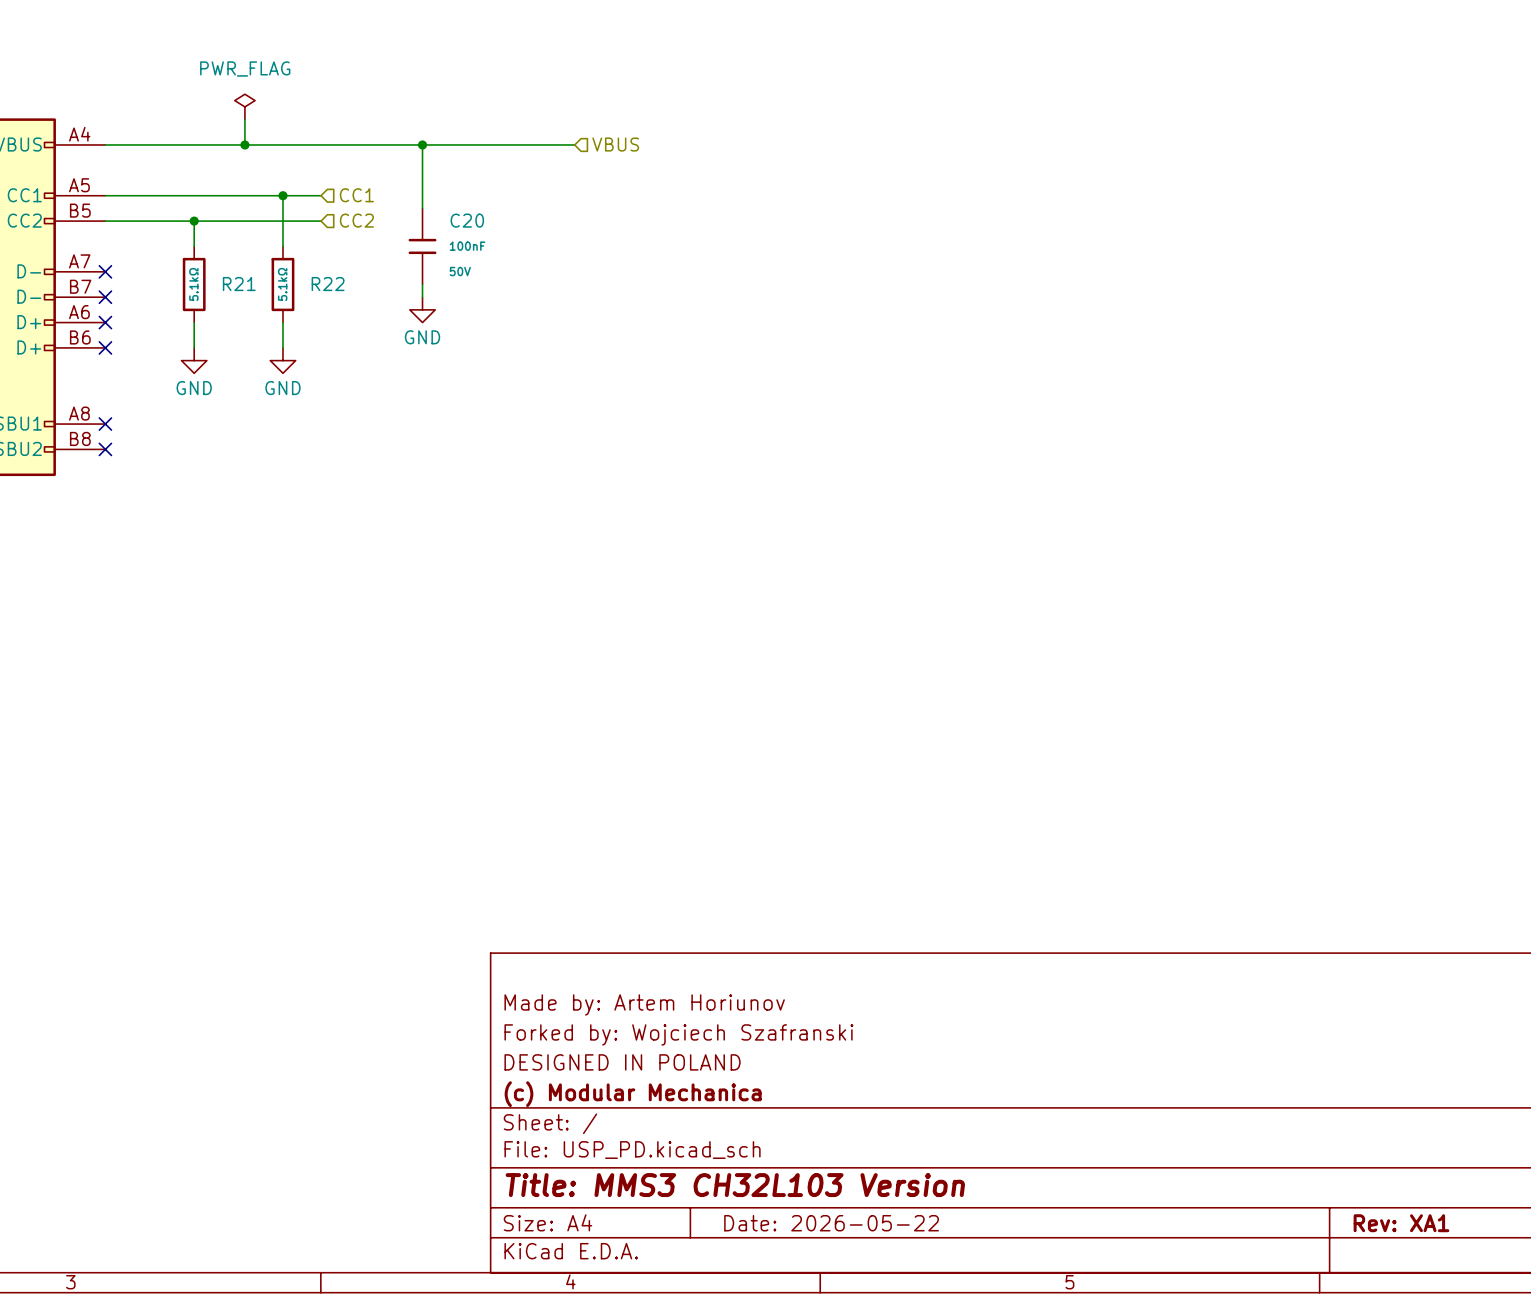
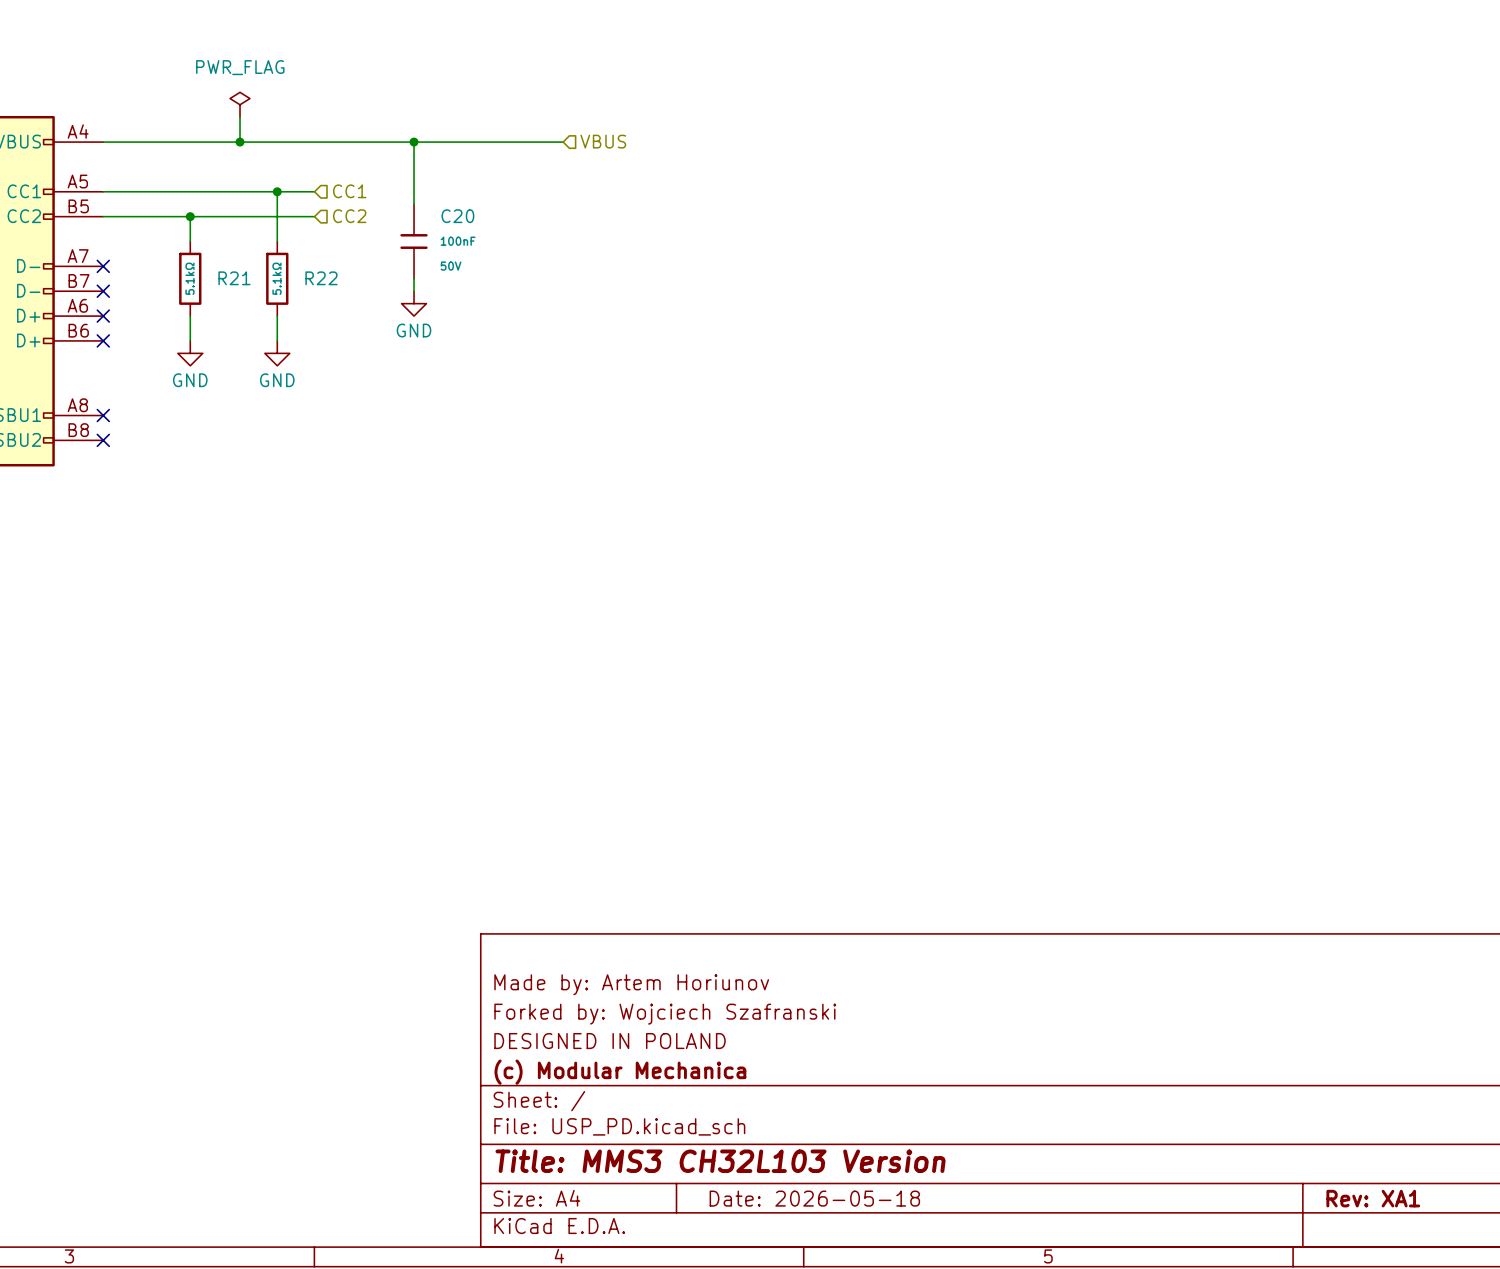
title block: Date: 2026-05-22 (831, 1223) -> Date: 2026-05-18 (814, 1198)

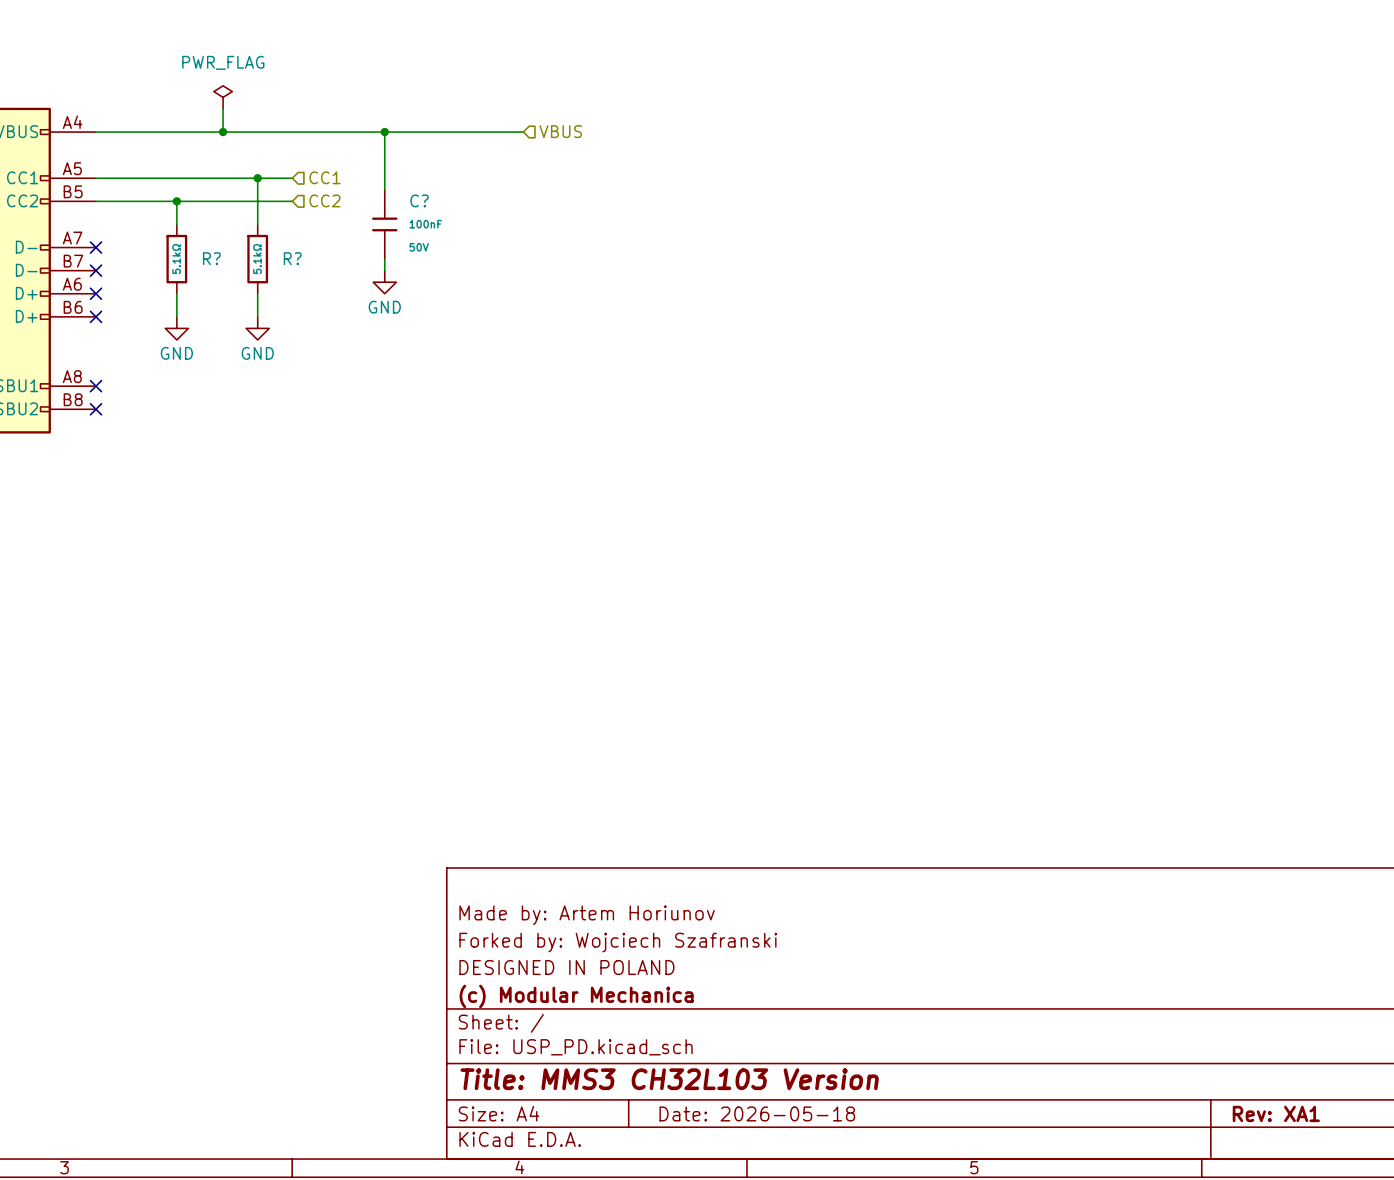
C20 name: C20 (457, 216) -> C? (419, 200)
R21 name: R21 (234, 278) -> R? (211, 258)
R22 name: R22 (321, 278) -> R? (292, 258)

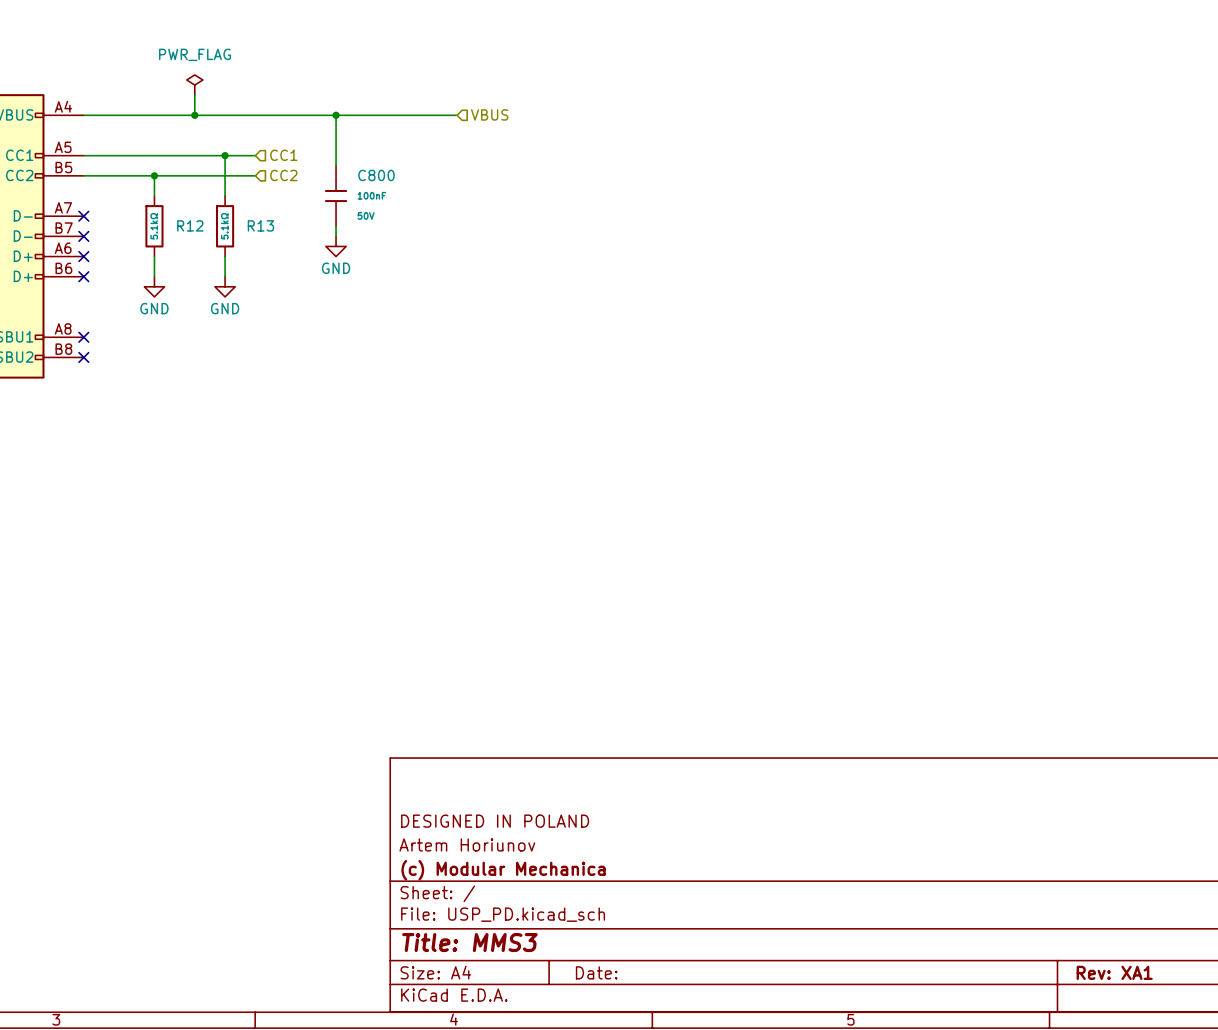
C? name: C? (419, 200) -> C800 (376, 175)
R? name: R? (211, 258) -> R12 (190, 225)
R? name: R? (292, 258) -> R13 (260, 225)
title block: Made by: Artem Horiunov (587, 915) -> none
title block: Forked by: Wojciech Szafranski (618, 942) -> DESIGNED IN POLAND (495, 821)
title block: DESIGNED IN POLAND (566, 967) -> Artem Horiunov (467, 844)
title block: Title: MMS3 CH32L103 Version (669, 1079) -> Title: MMS3 (469, 942)
title block: Date: 2026-05-18 (757, 1113) -> Date: (596, 972)

